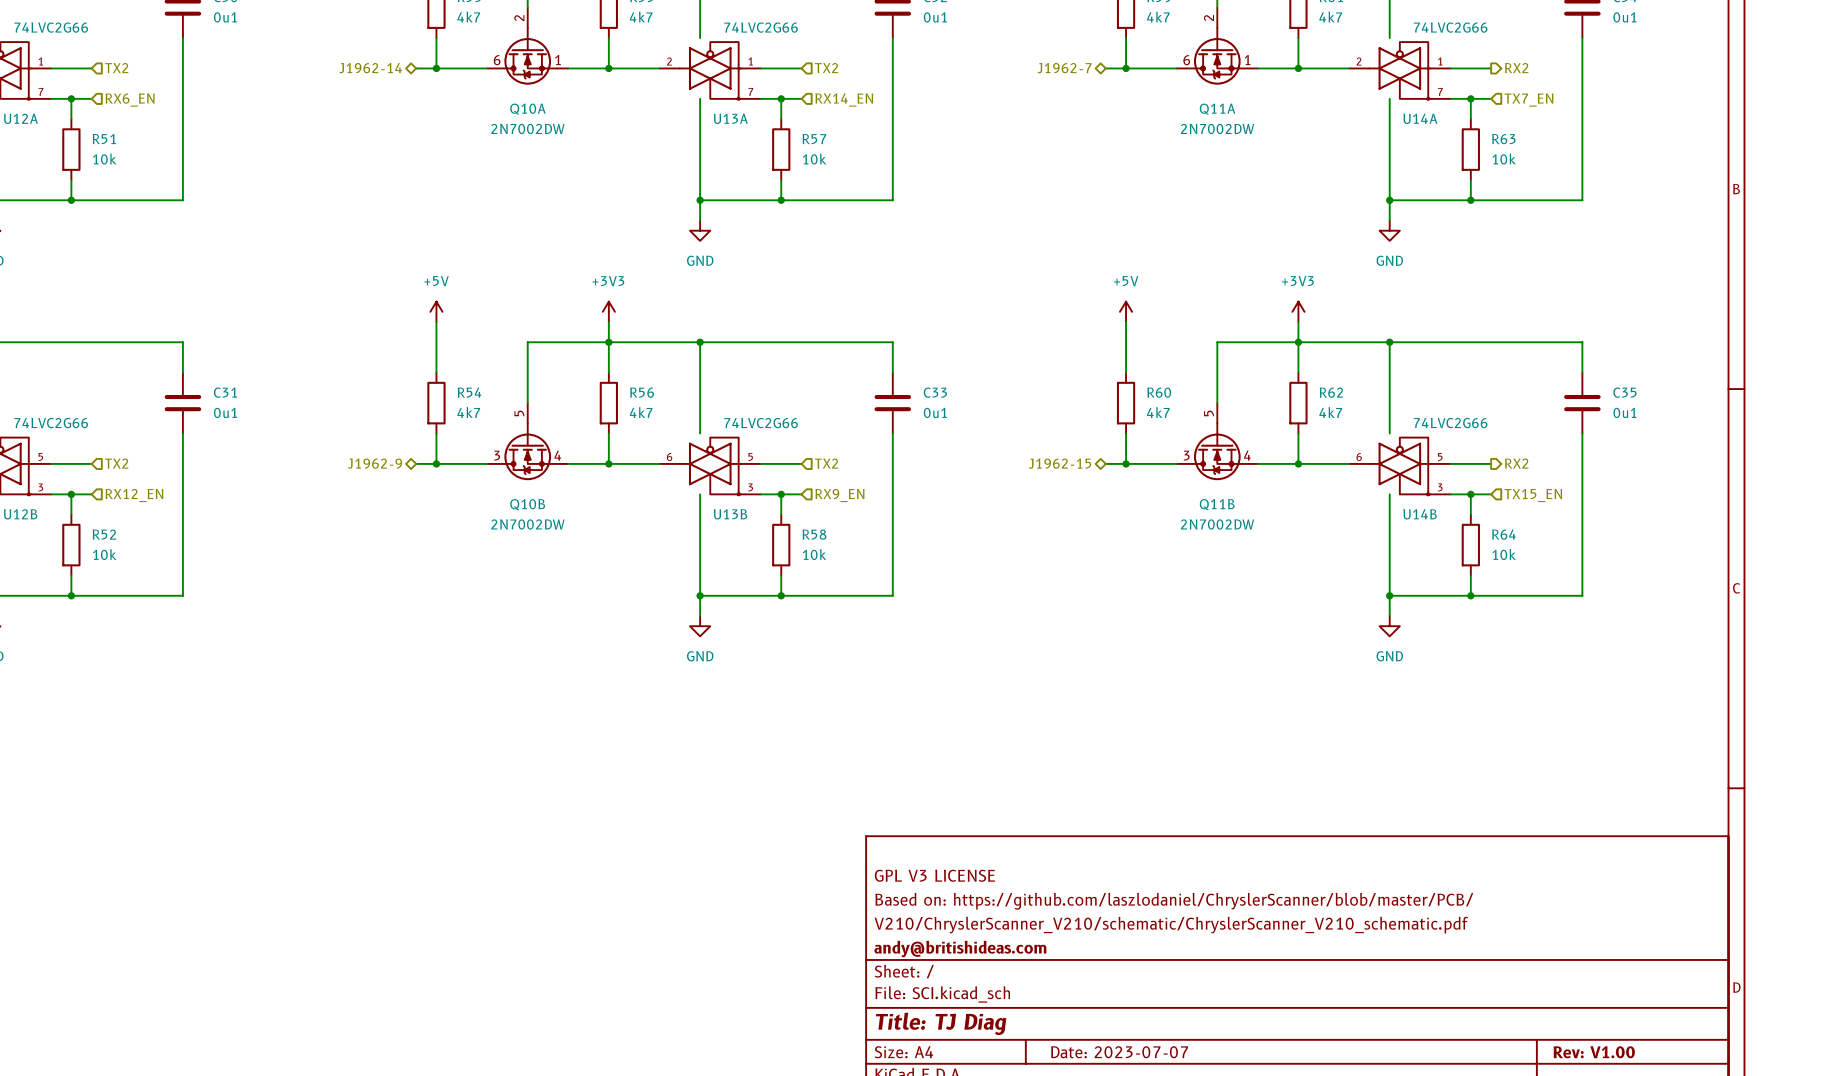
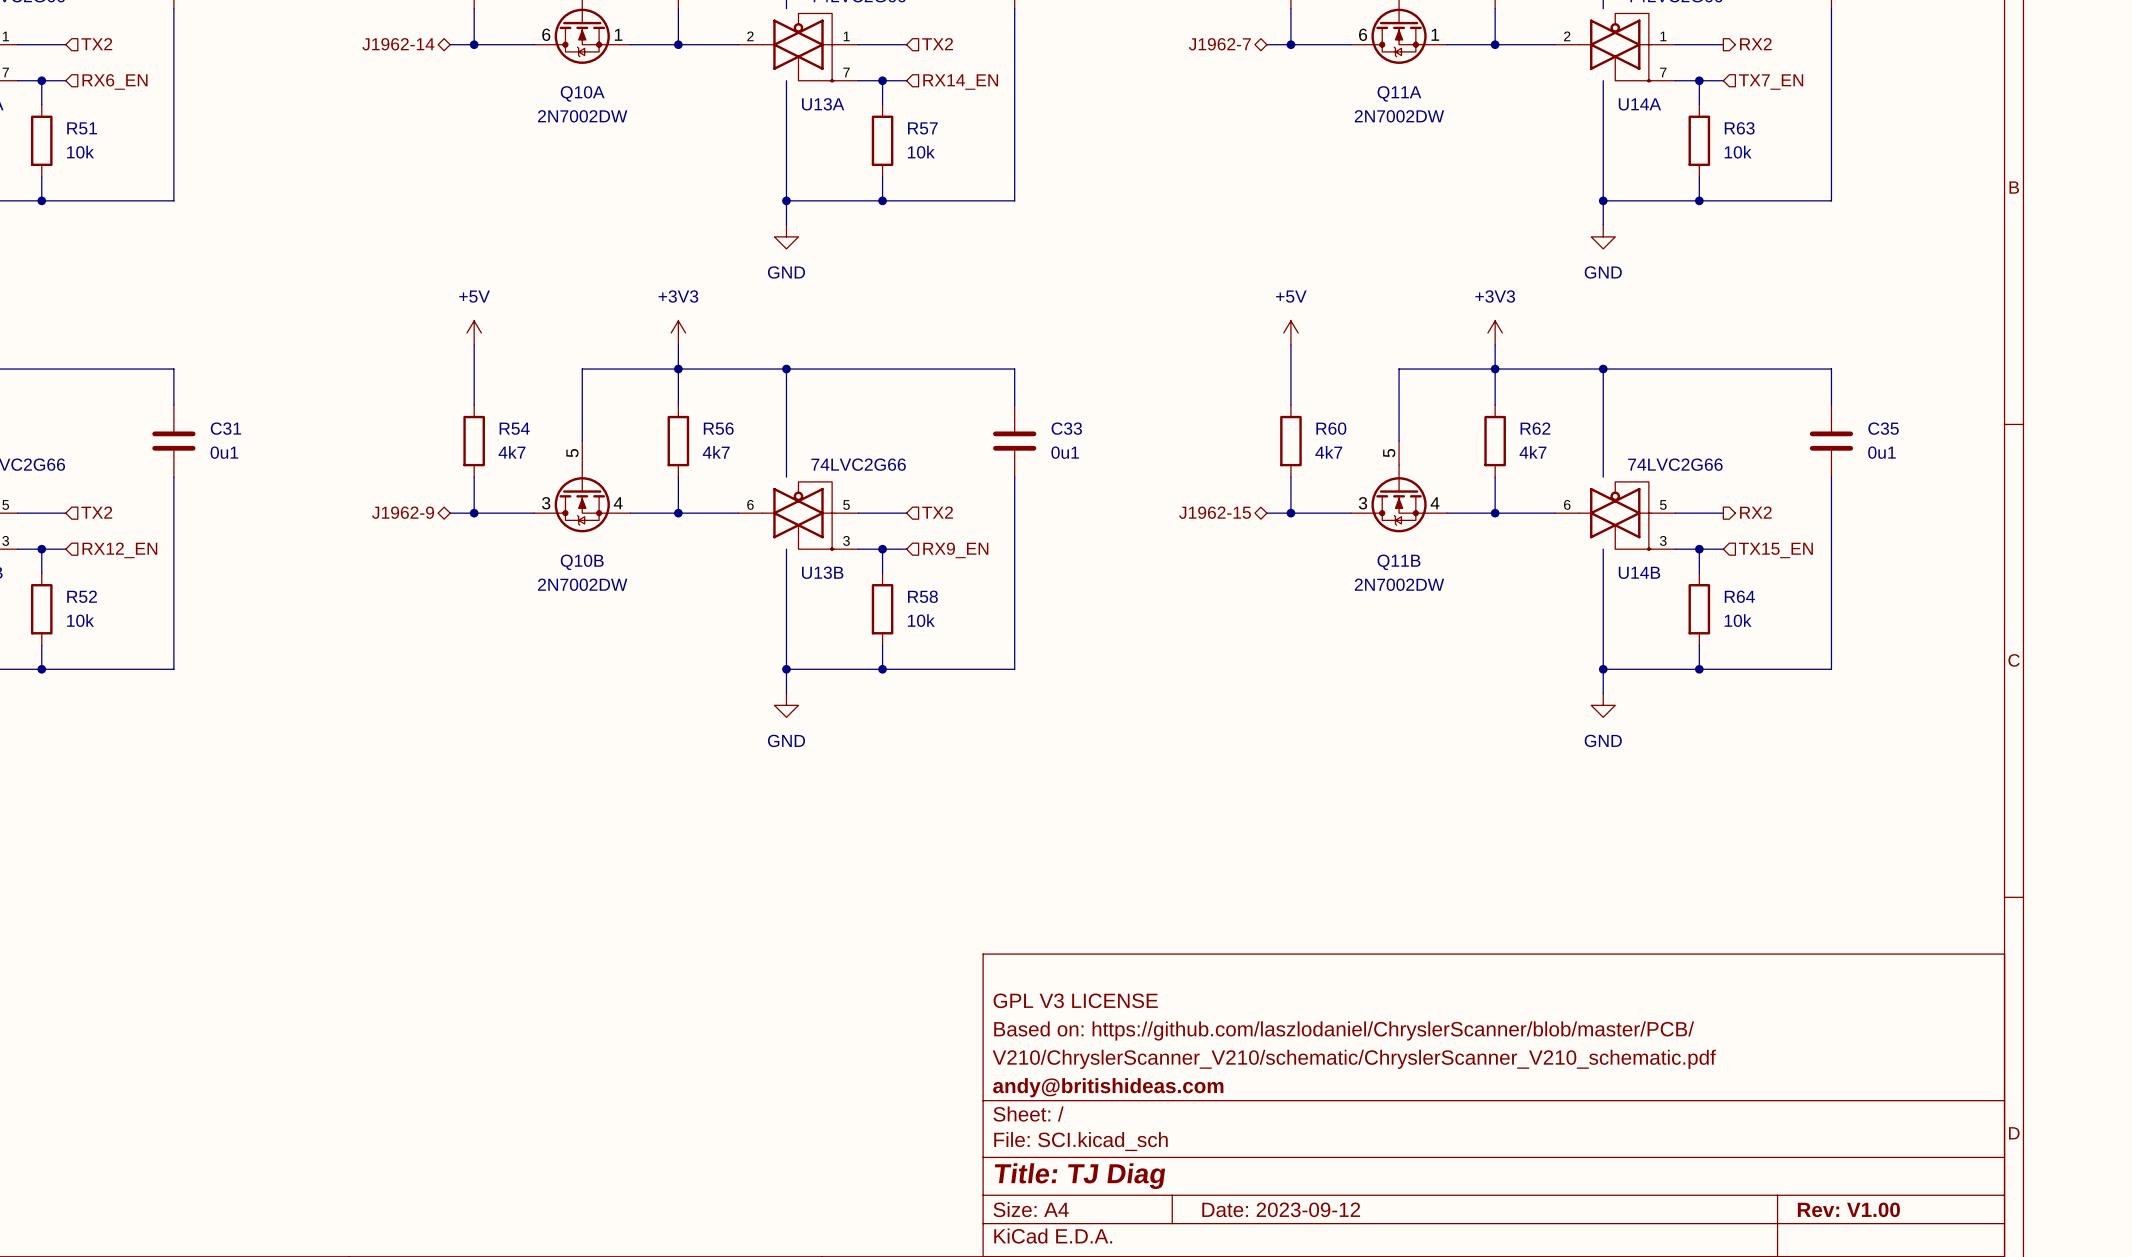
title block: Date: 2023-07-07 (1119, 1052) -> Date: 2023-09-12 (1281, 1209)

